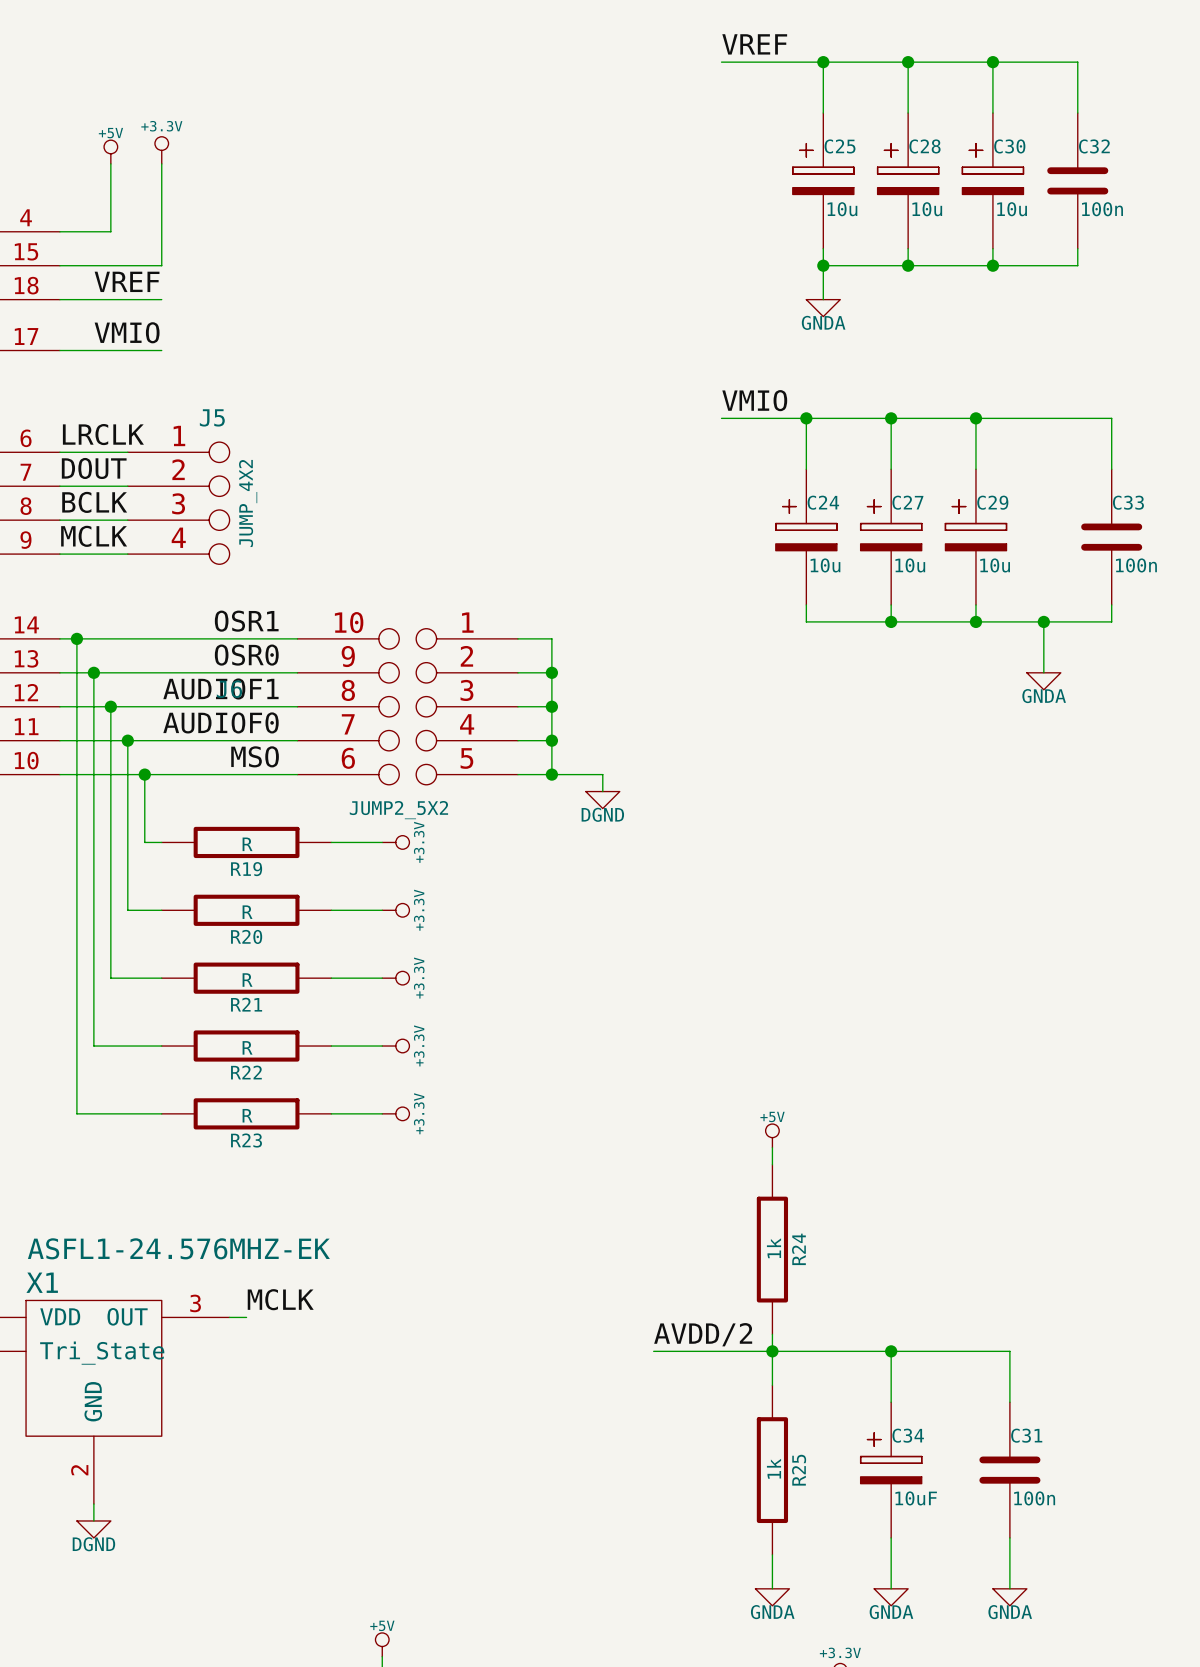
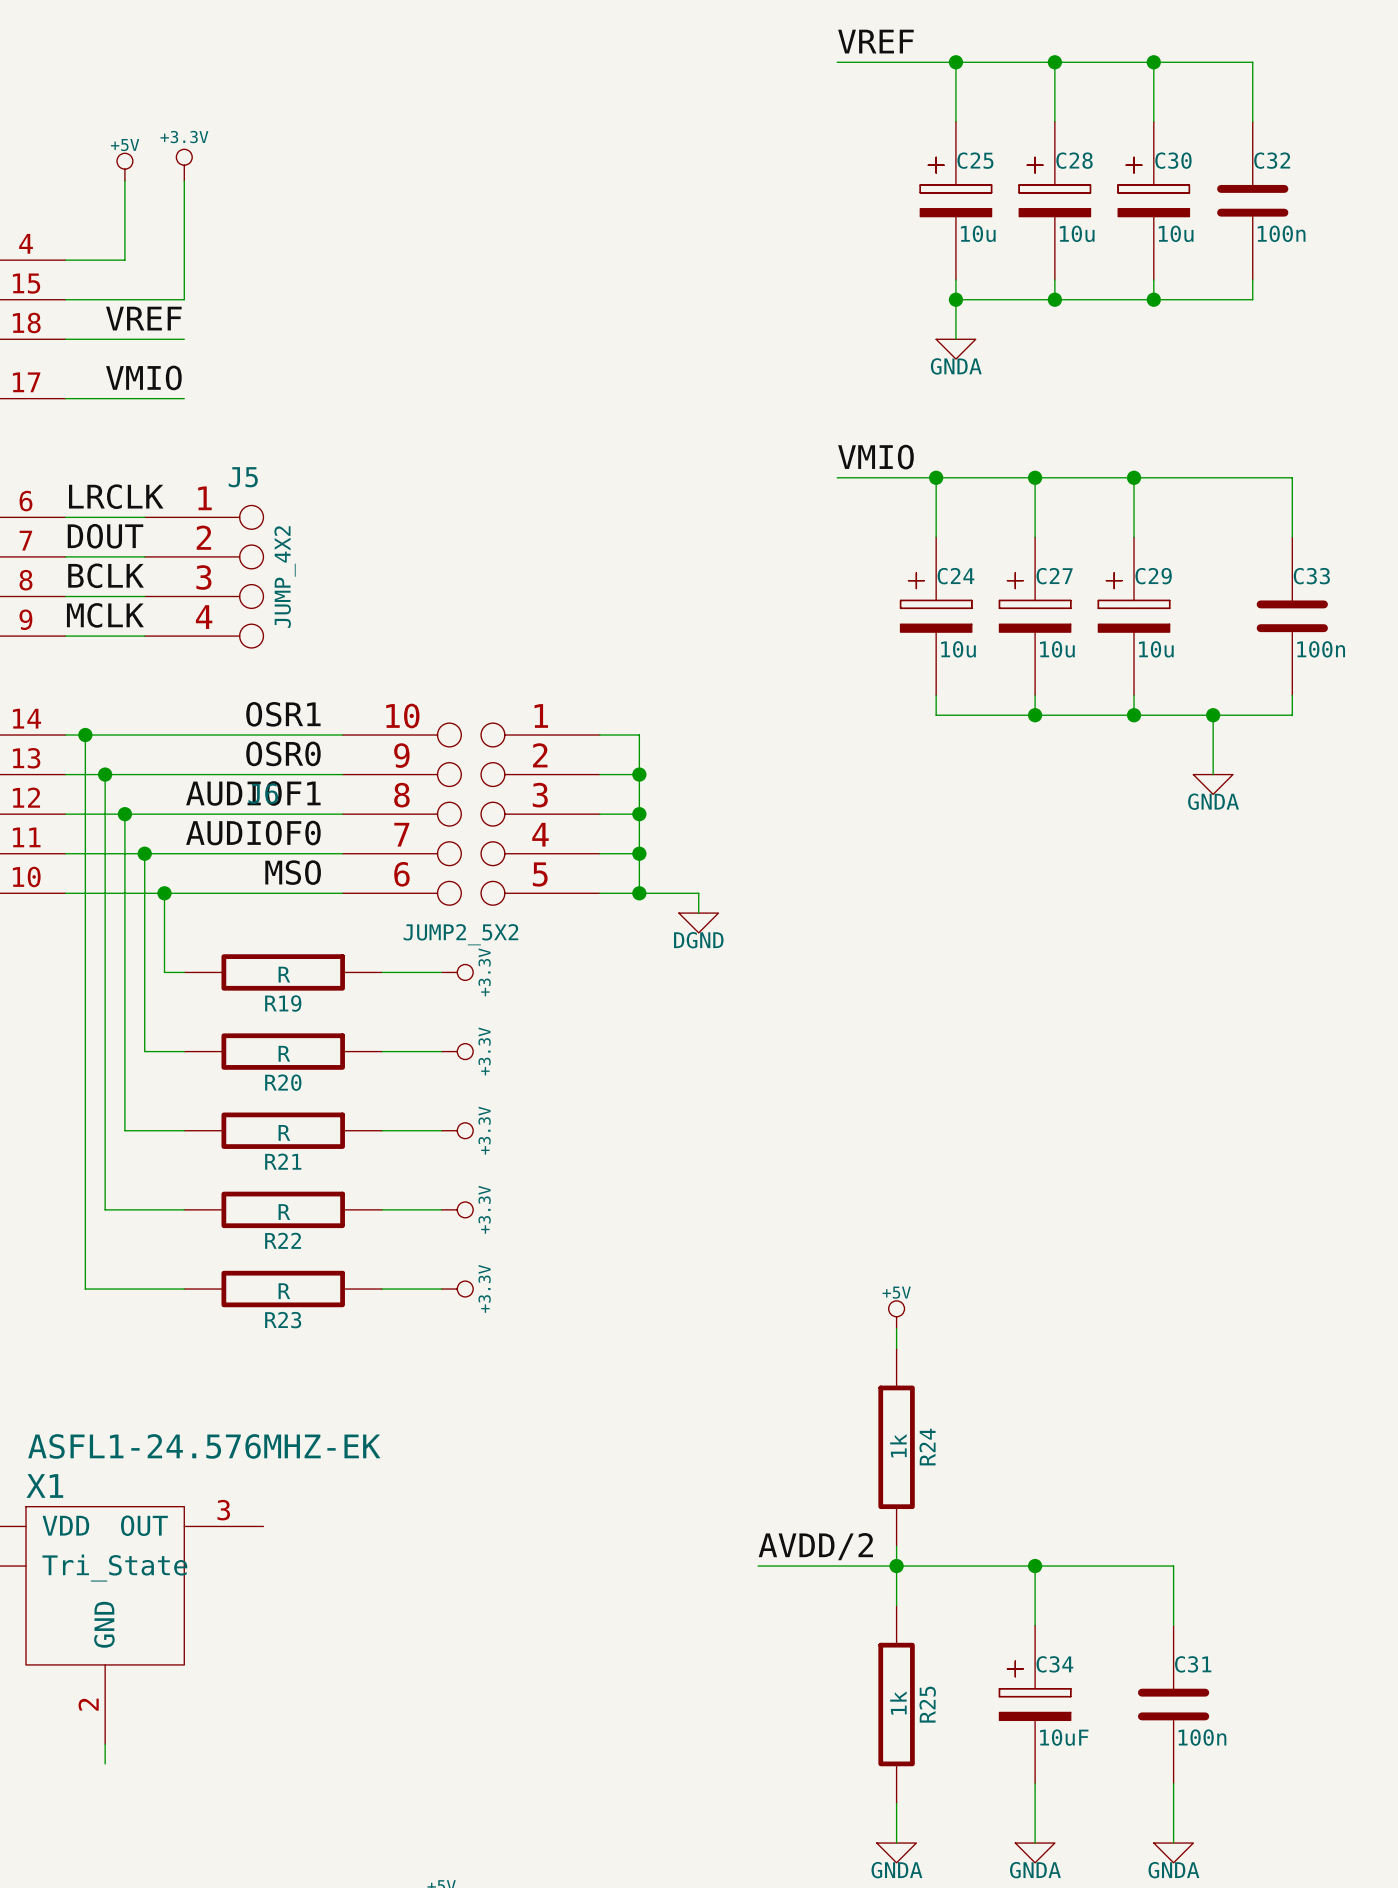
label: MCLK (280, 1299) -> none
wire: (229, 1317) (246, 1317) -> none
power symbol: DGND (93, 1529) -> none

